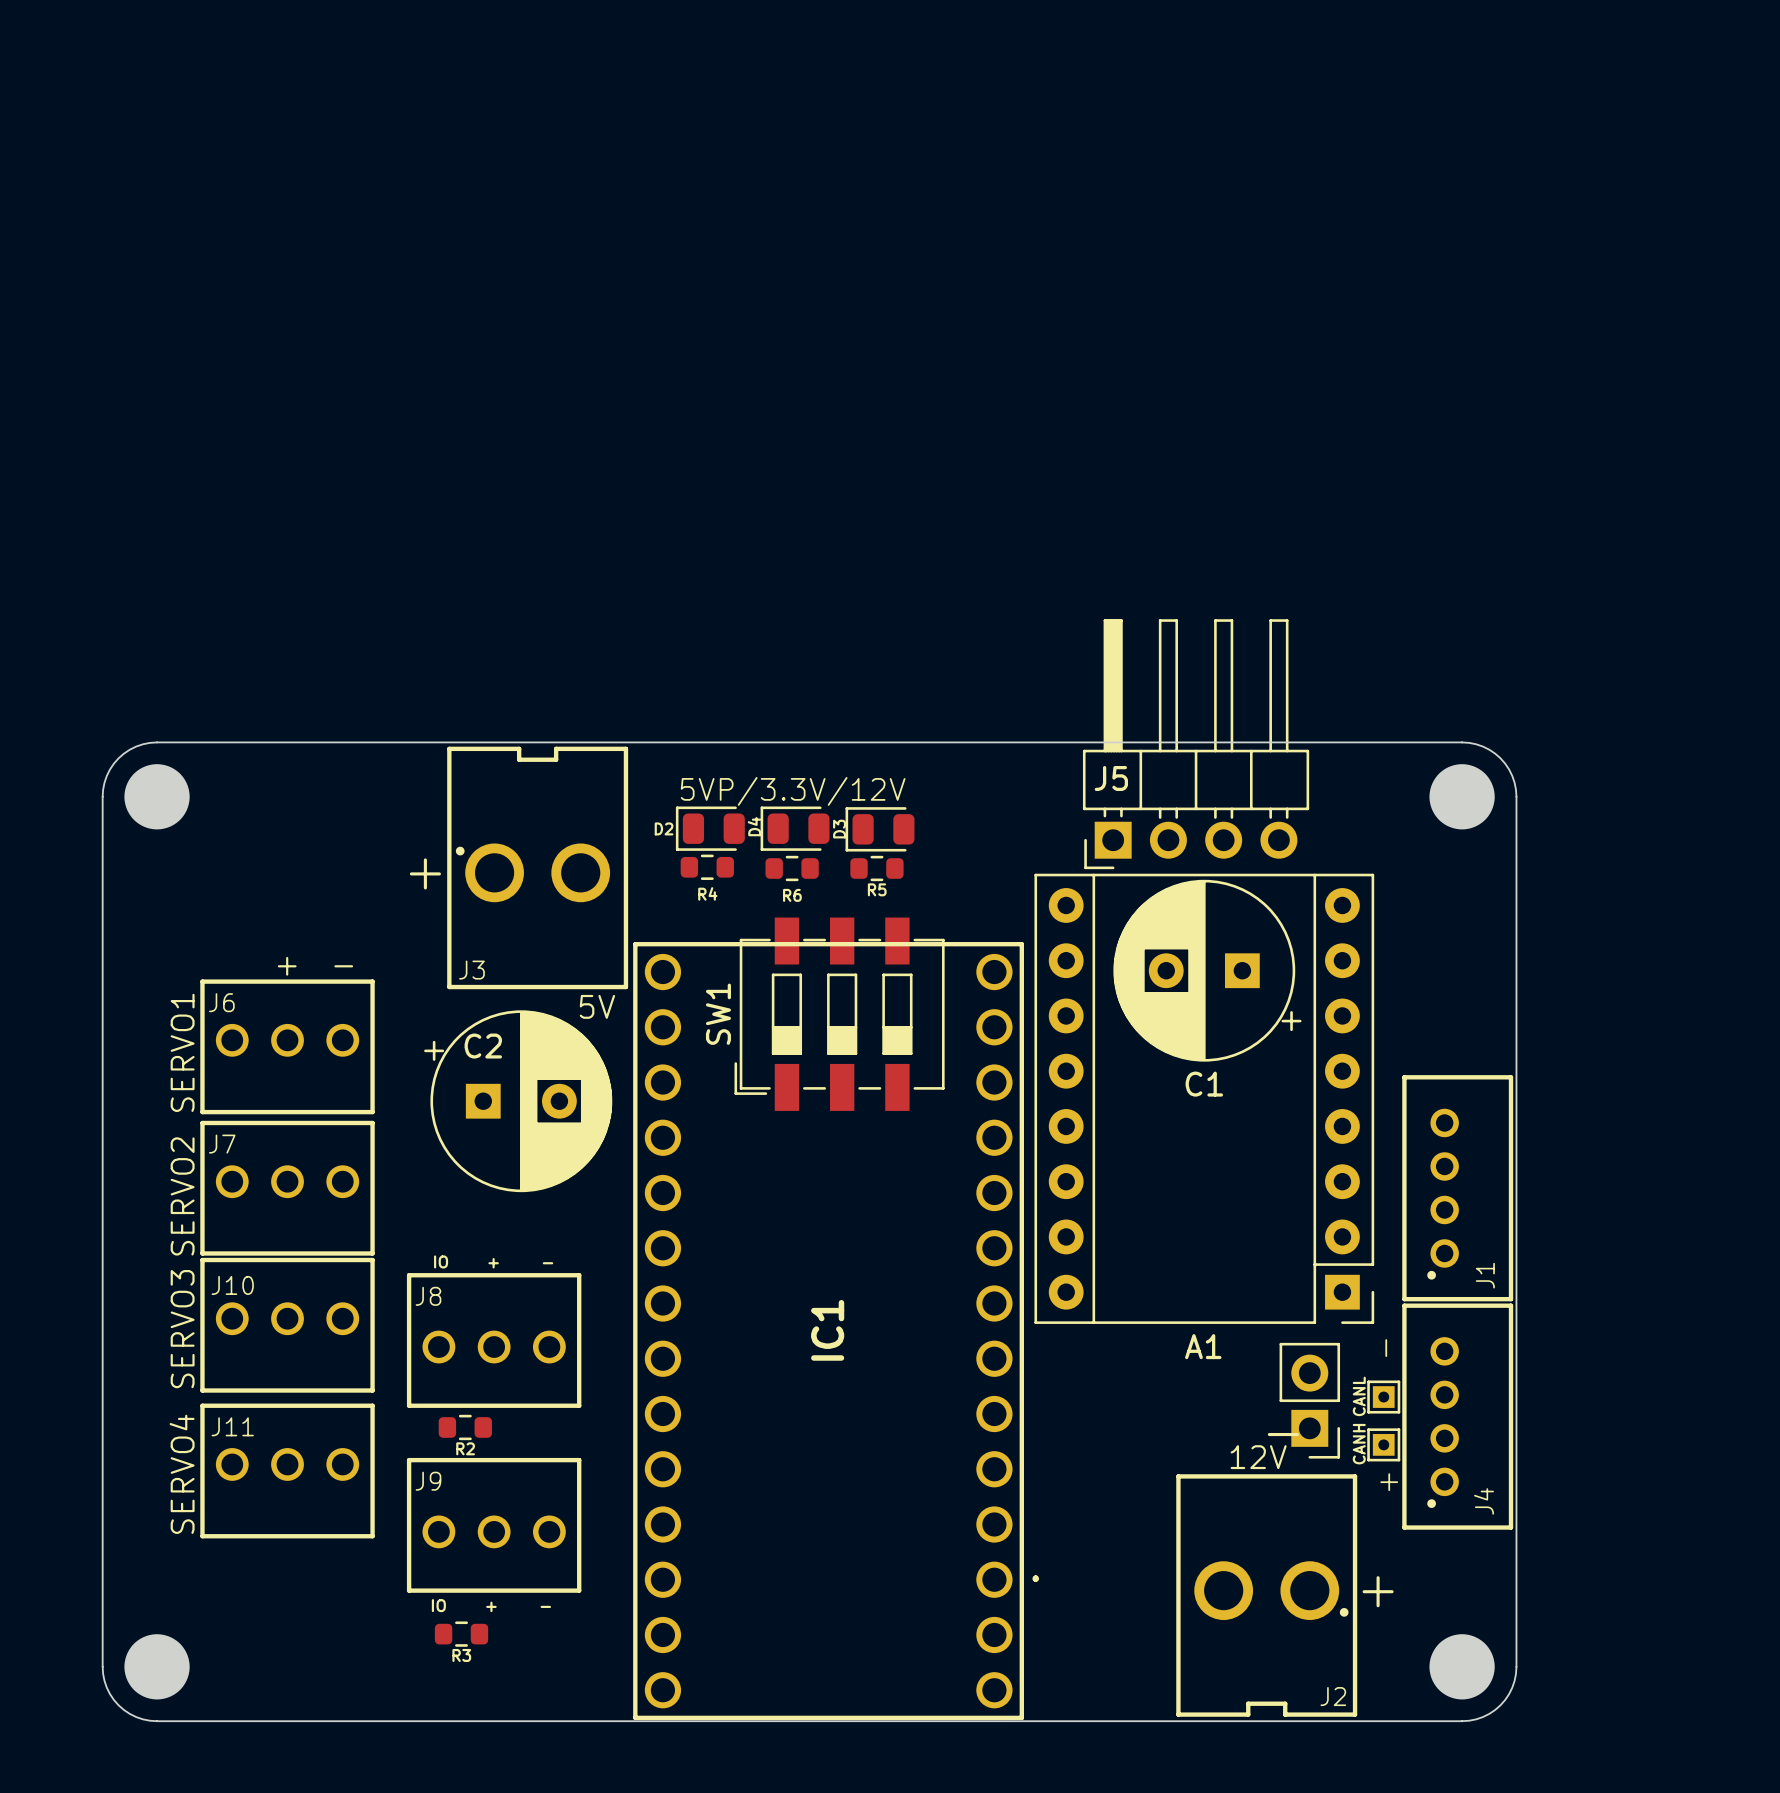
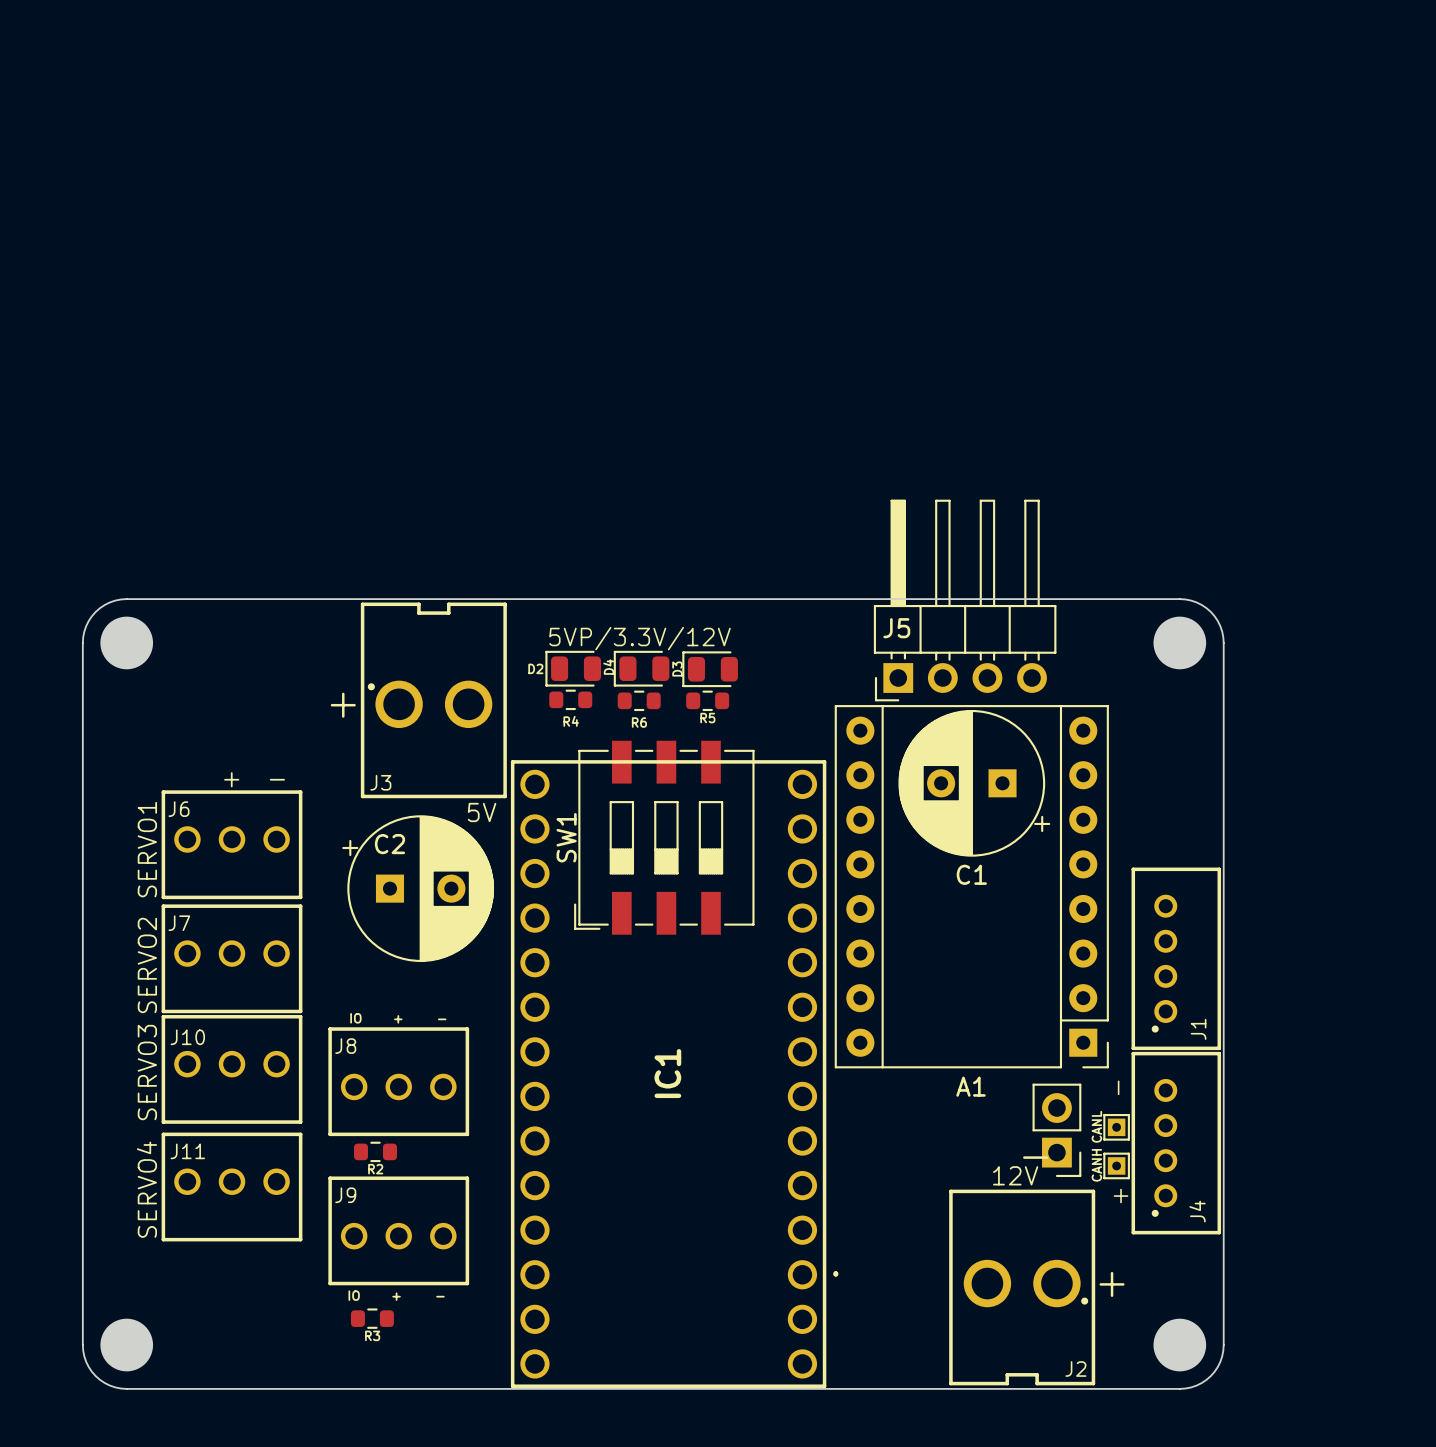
SW1 footprint: [734, 917, 945, 1111] -> [574, 740, 755, 935]

